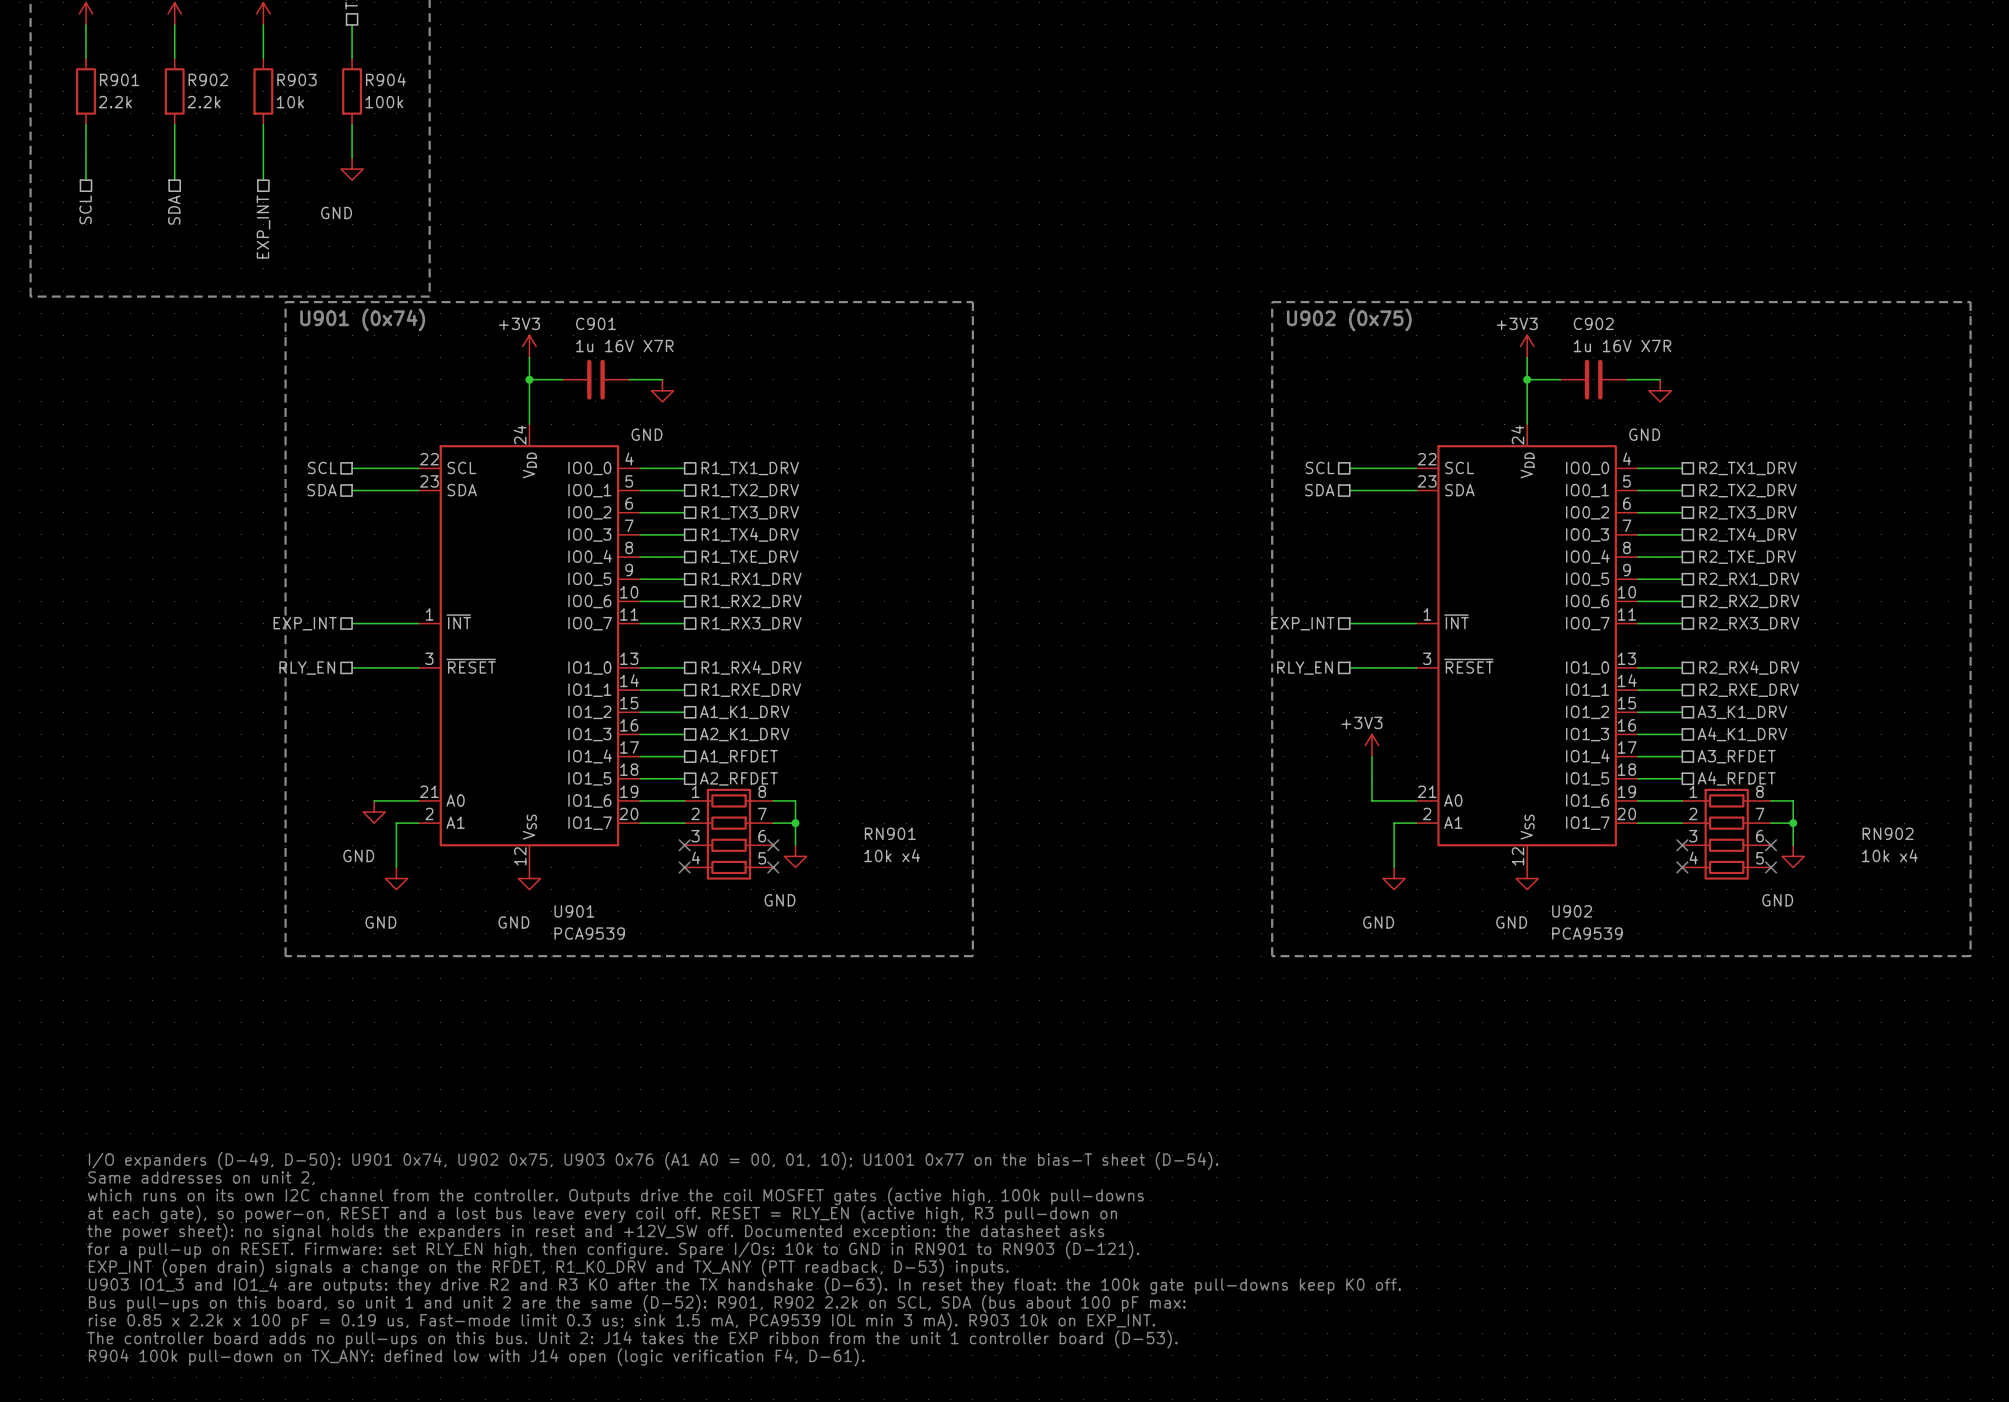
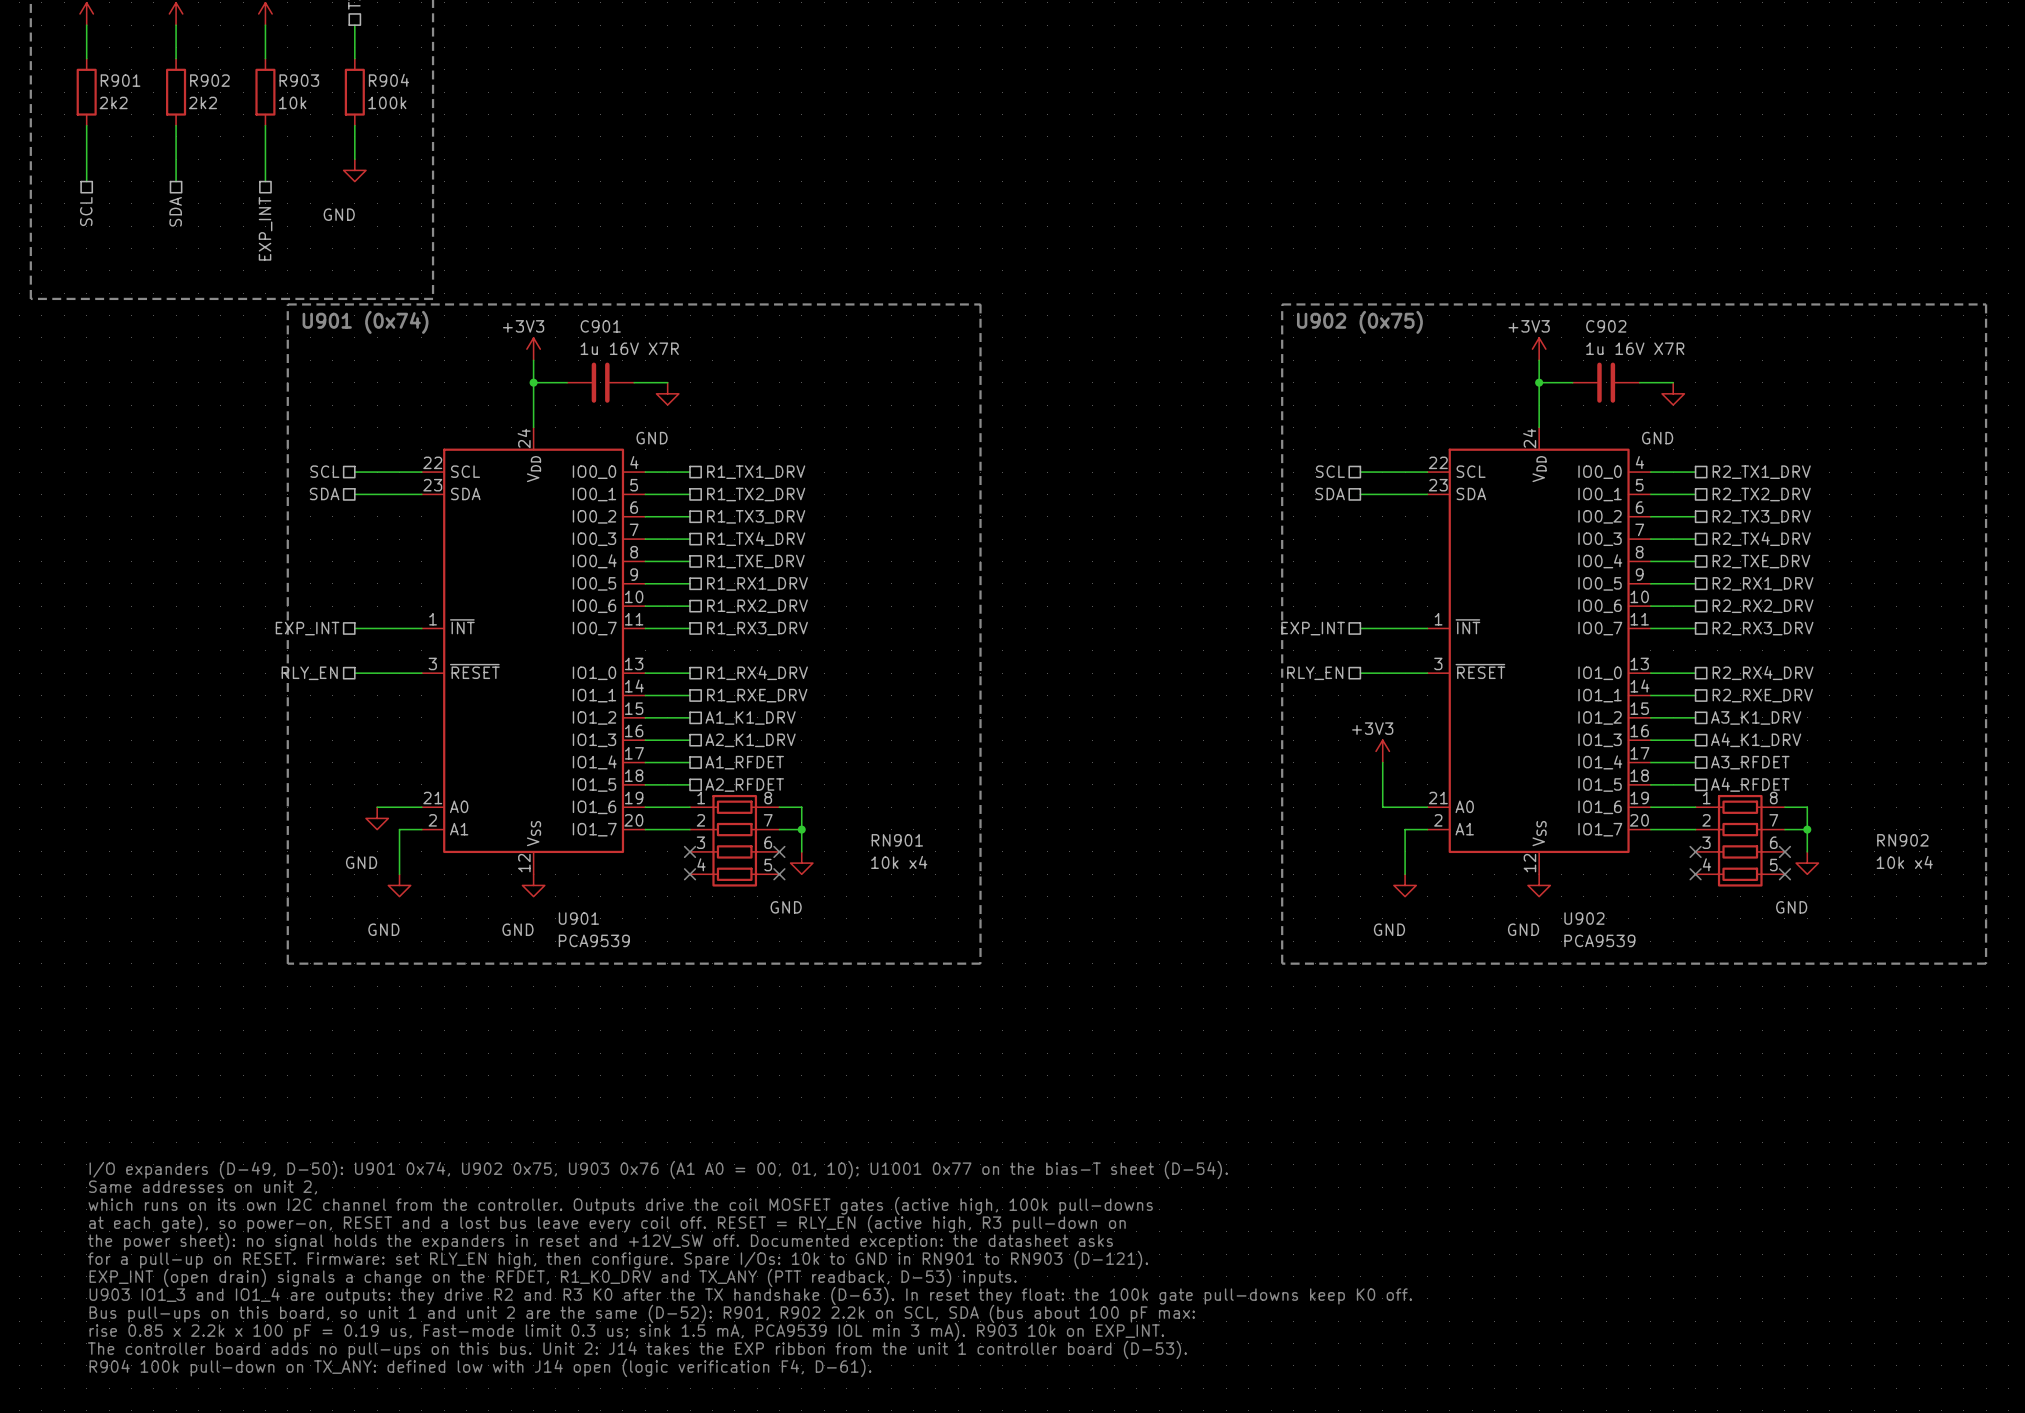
R901 value: 2.2k (115, 102) -> 2k2 (113, 102)
R902 value: 2.2k (204, 102) -> 2k2 (203, 102)

